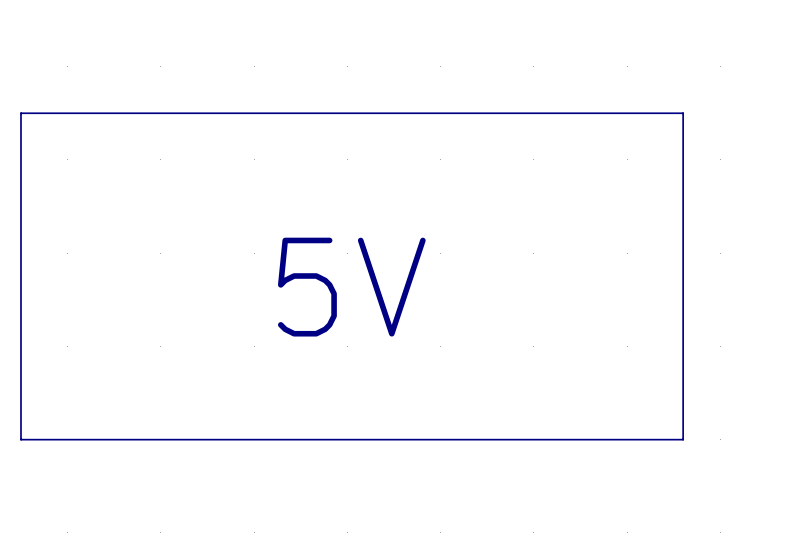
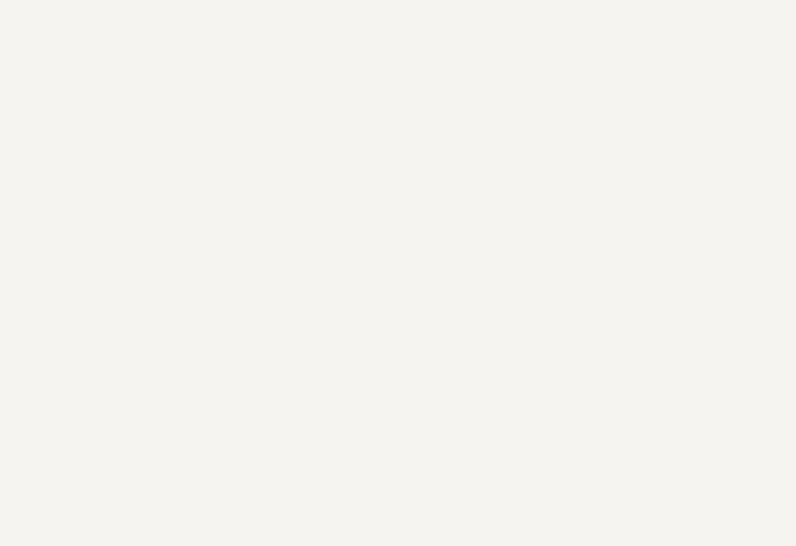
line: (20, 113) (683, 113) (683, 439) (20, 439) (20, 113) -> none
text: 5V (351, 287) -> none

